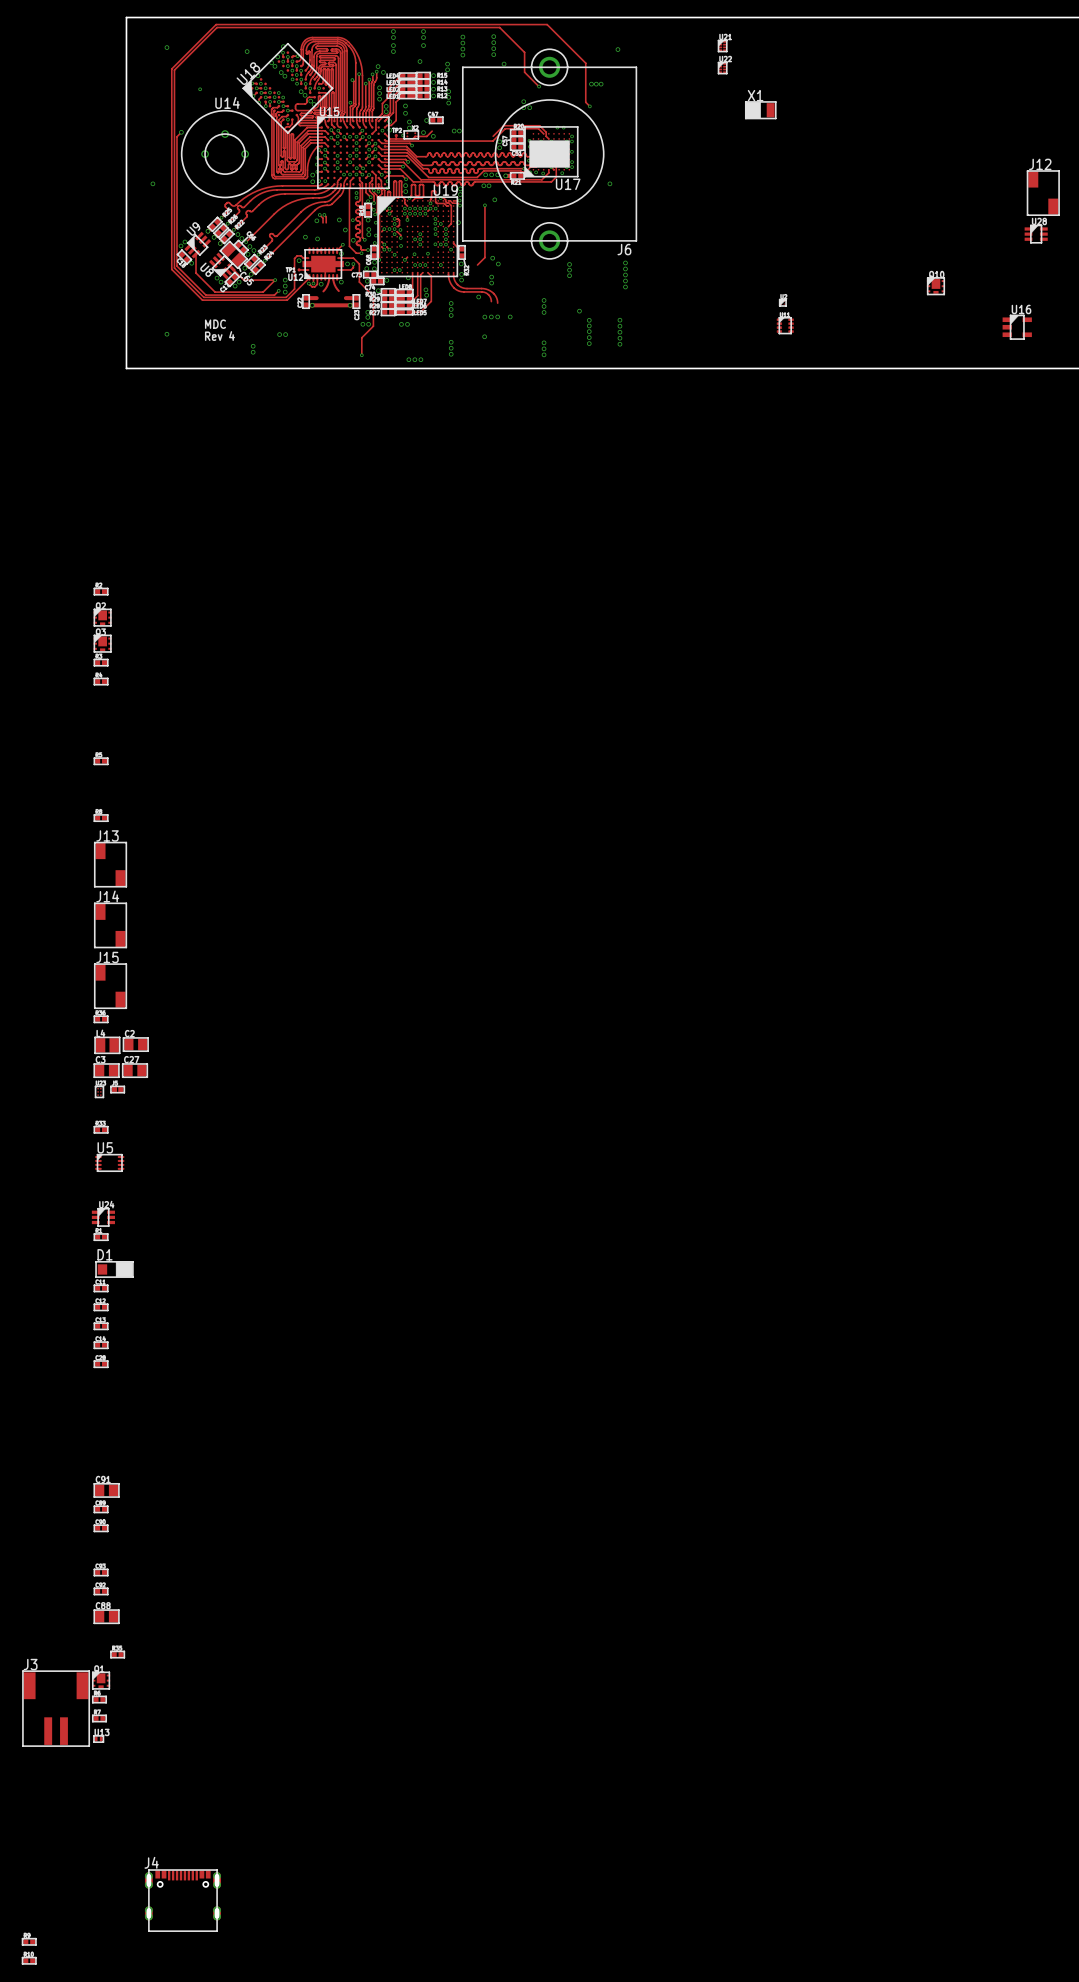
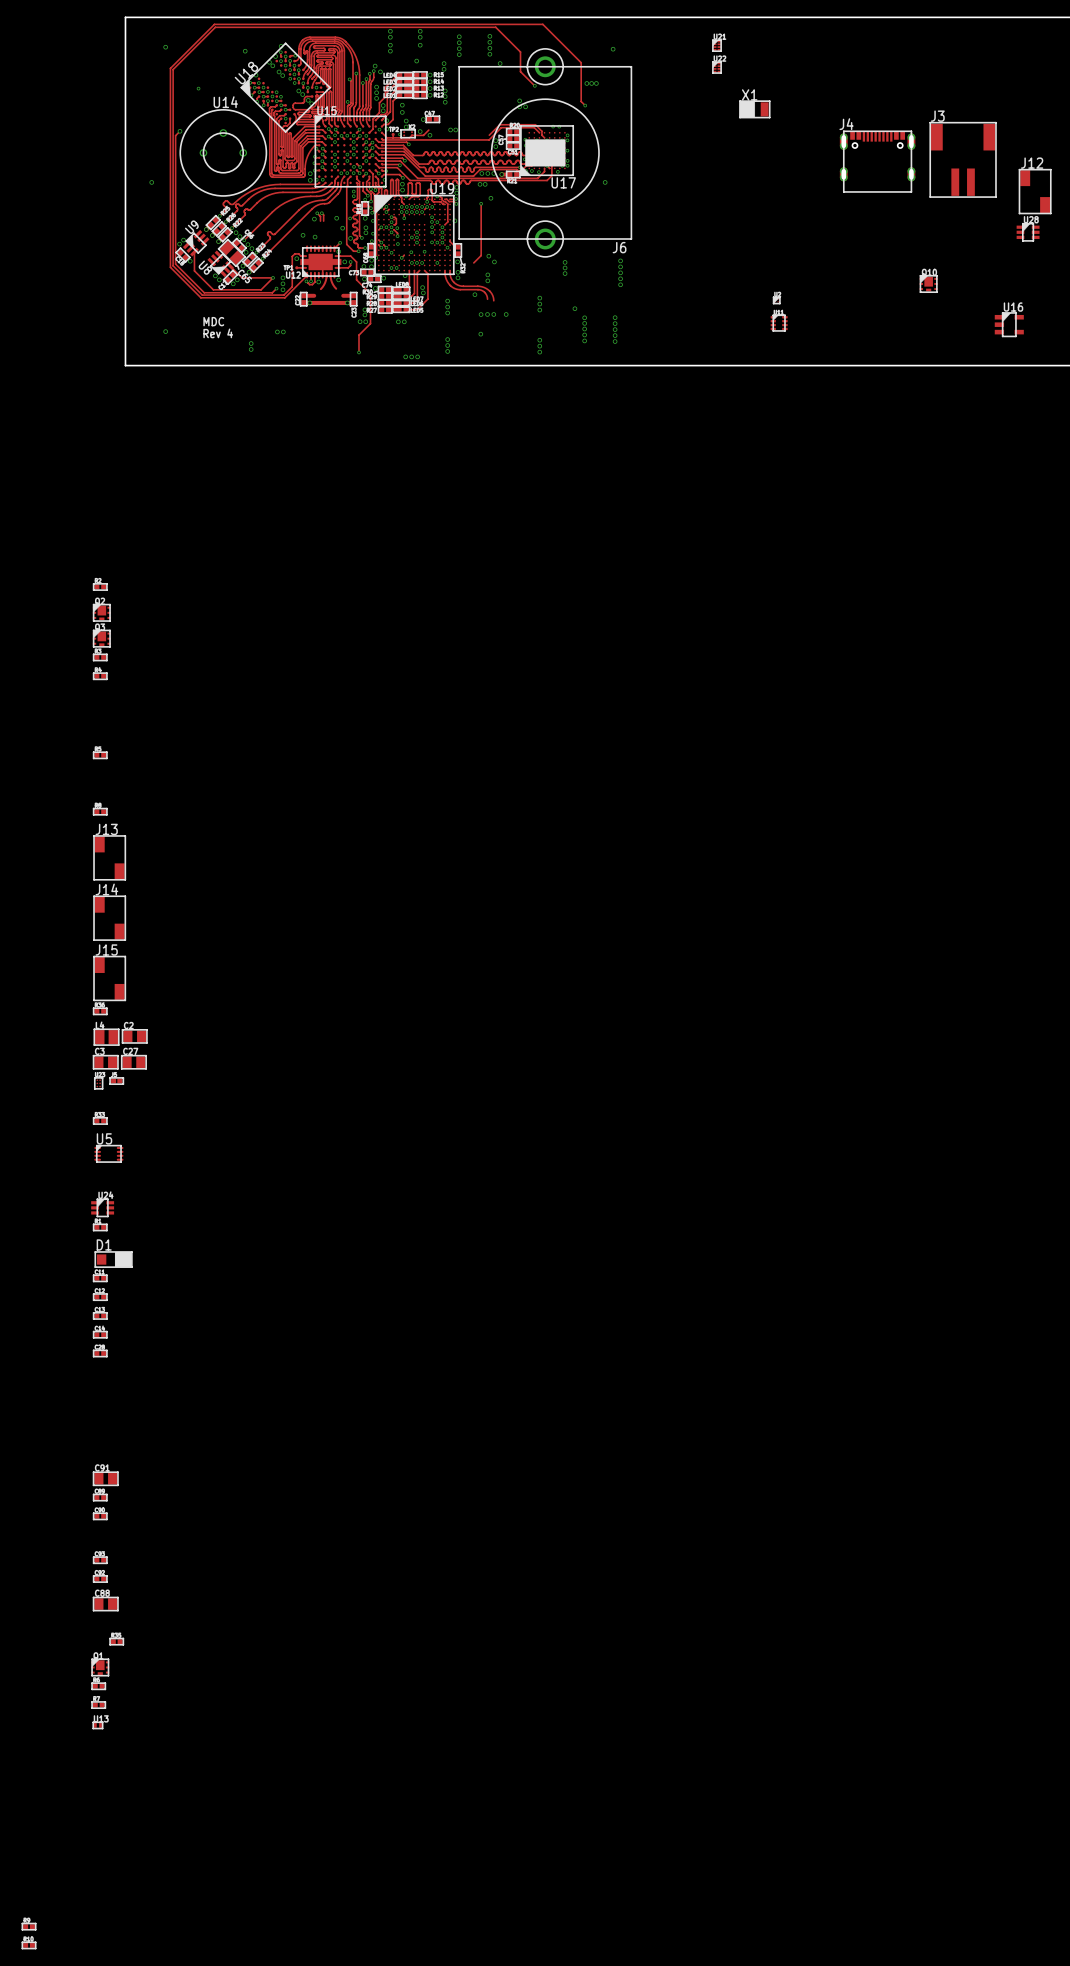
J3 position: (56, 1708) -> (963, 159)
J4 position: (182, 1900) -> (877, 161)

